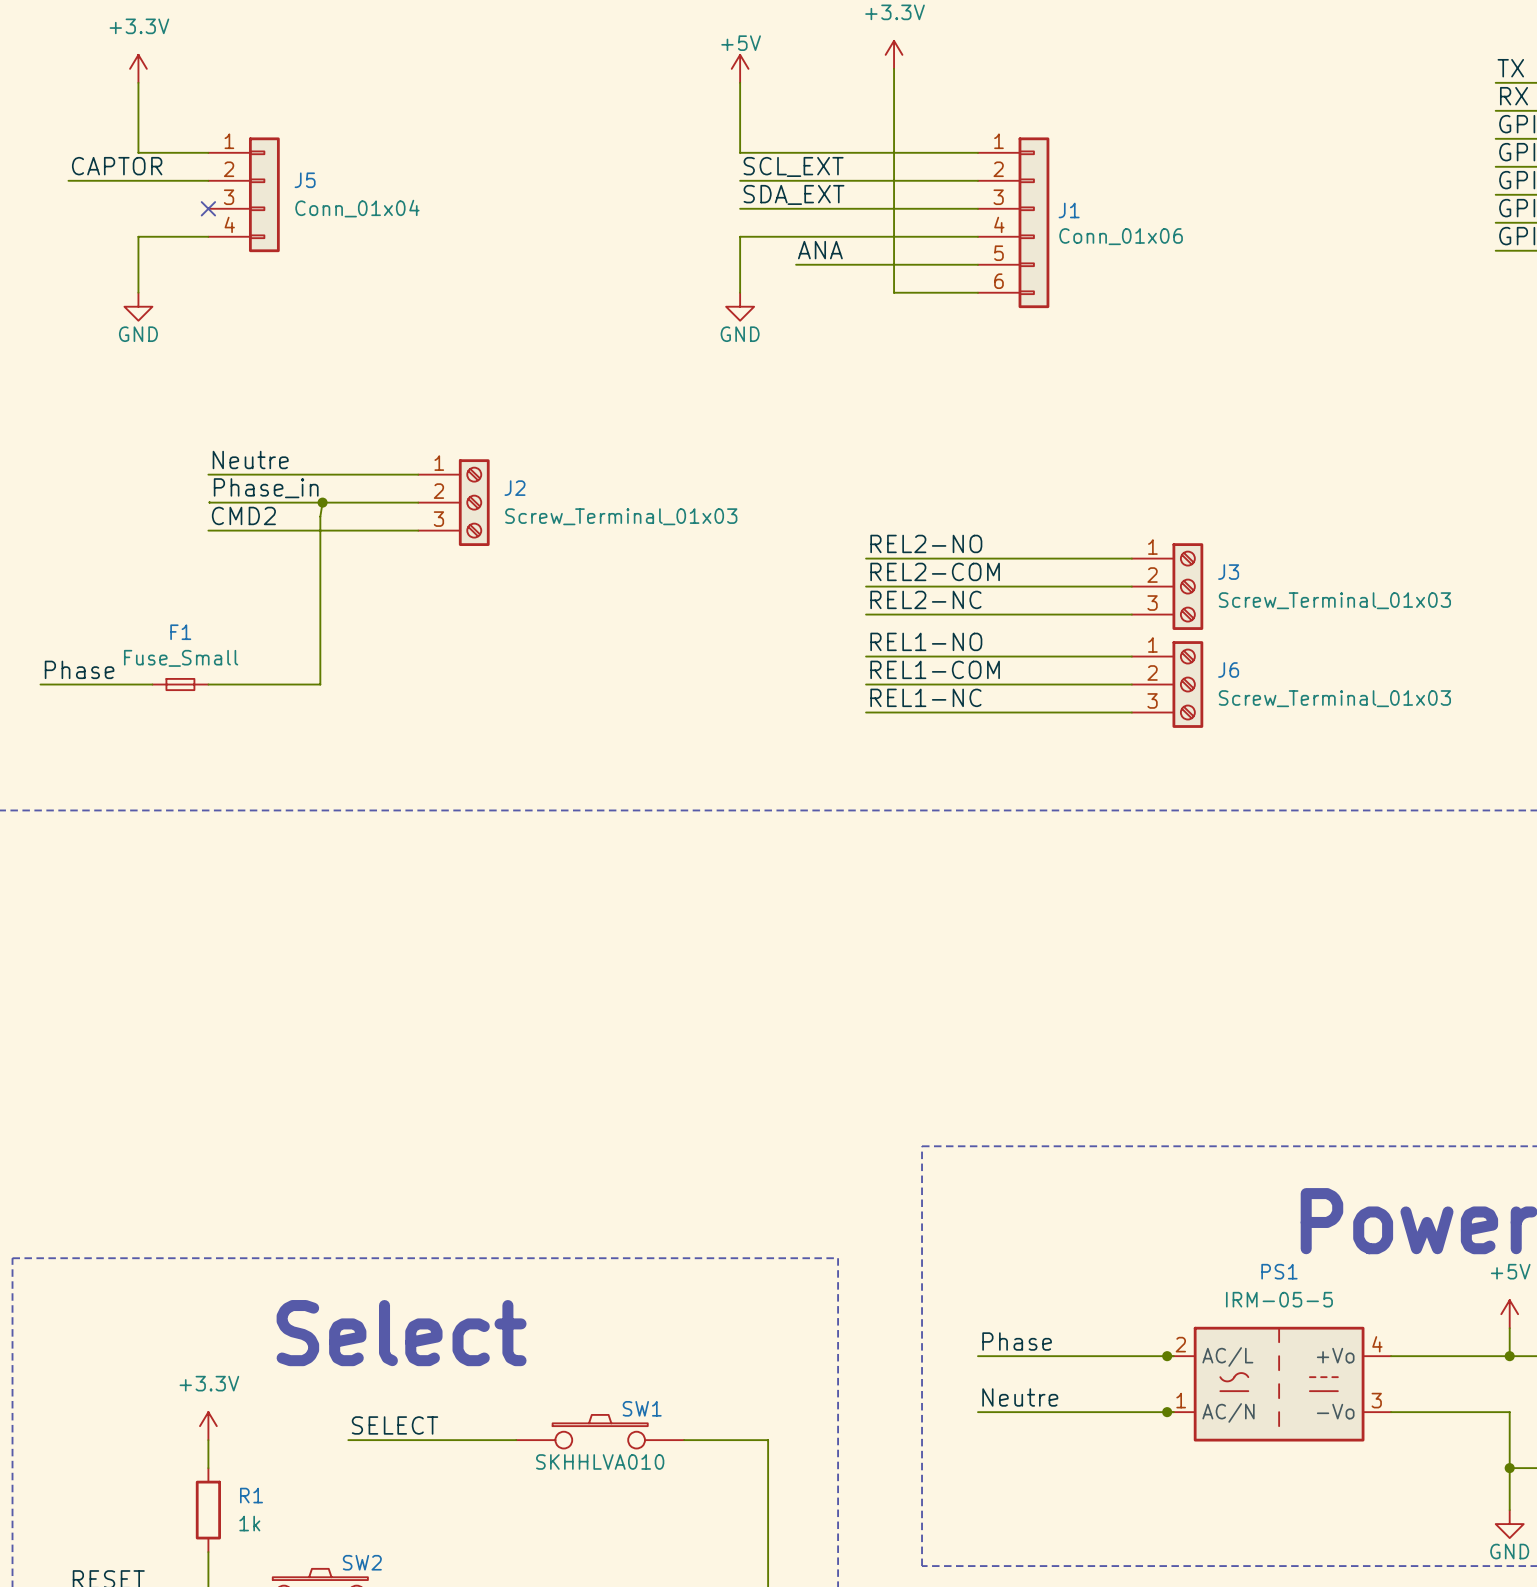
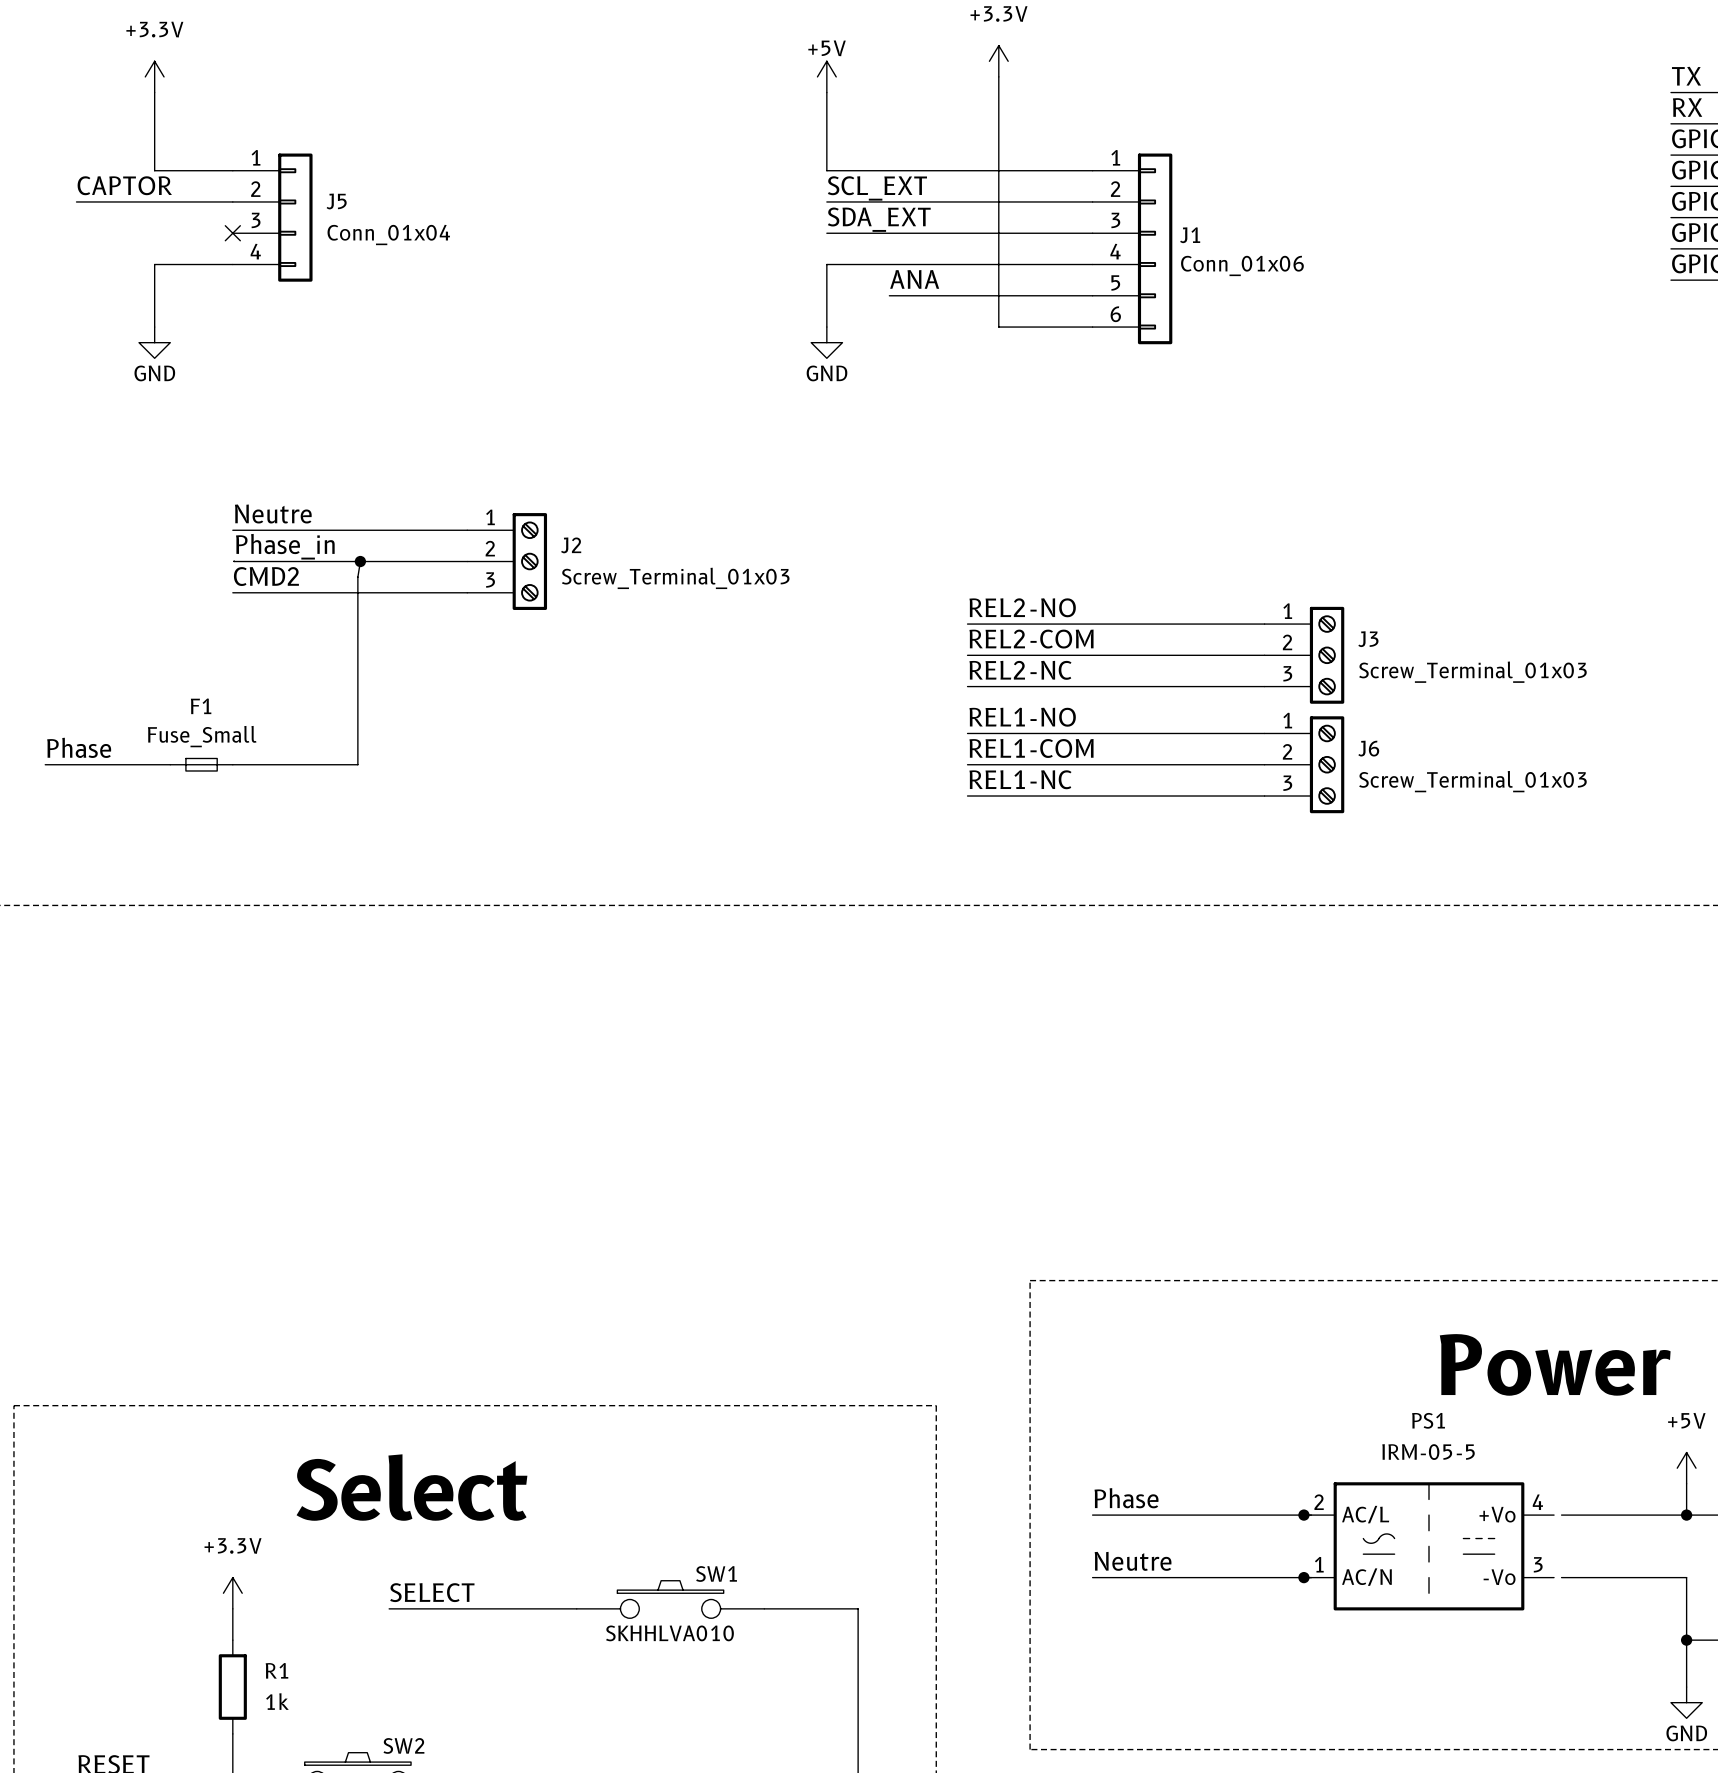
wire: (1391, 1356) (1397, 1356) -> none
wire: (1391, 1412) (1397, 1412) -> none

